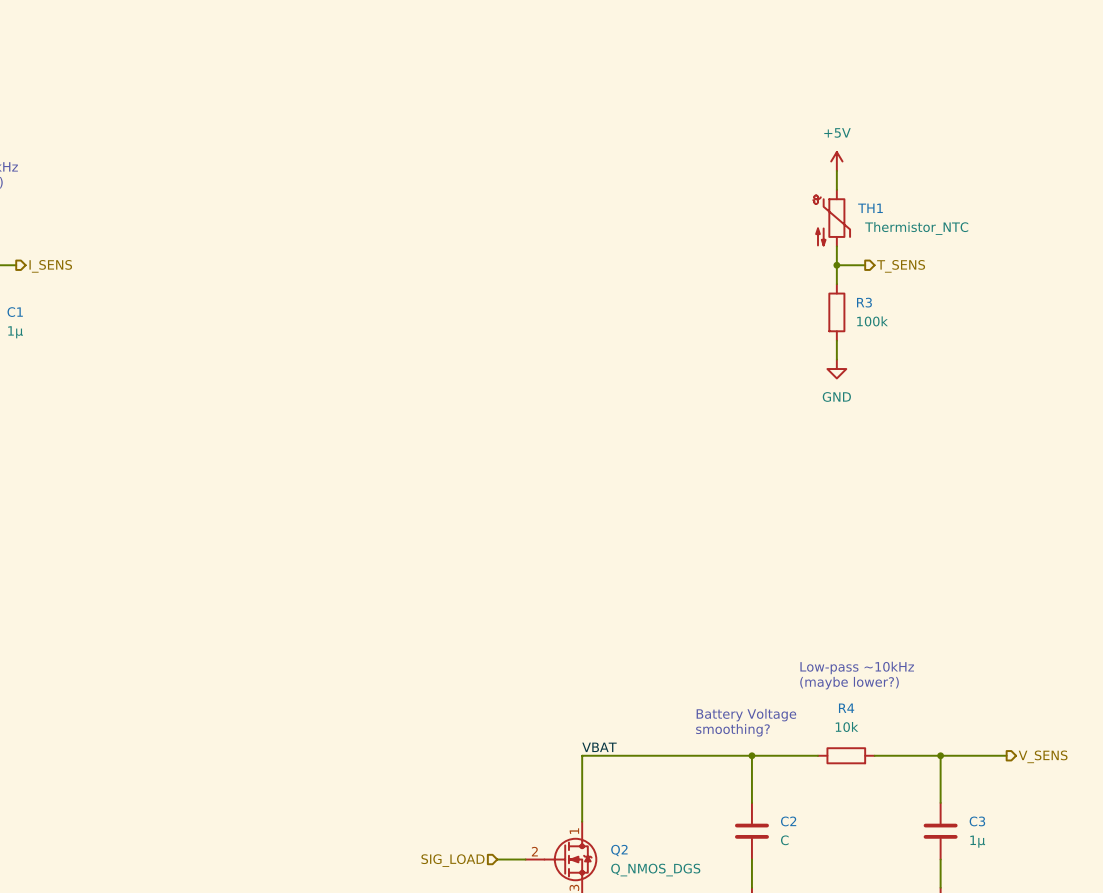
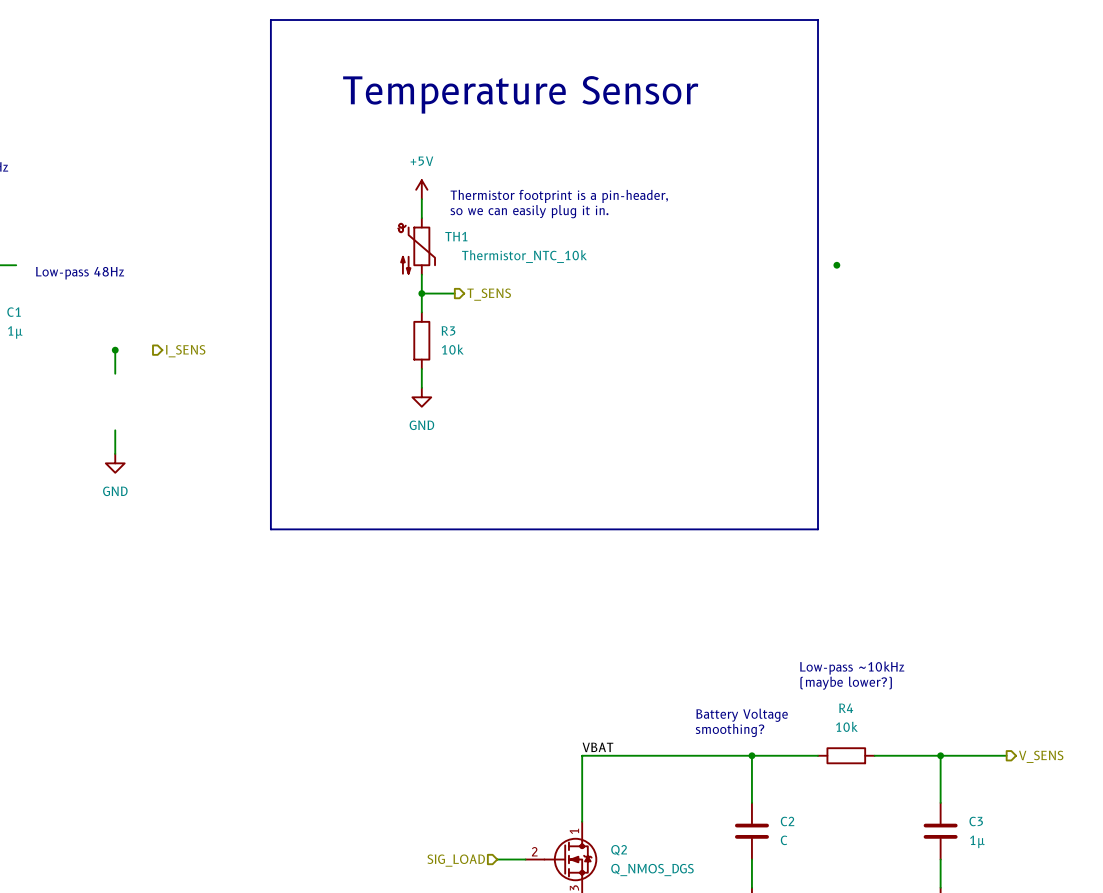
line: none -> (270, 20) (270, 529) (818, 529) (818, 20) (270, 20)
text: none -> Temperature Sensor (520, 94)
power symbol: +5V (836, 161) -> none
wire: (836, 170) (836, 189) -> none
power symbol: none -> +5V (421, 189)
text: none -> Thermistor footprint is a pin-header, (559, 196)
wire: none -> (421, 199) (421, 218)
text: none -> so we can easily plug it in. (529, 211)
TH1 position: (831, 218) -> (416, 246)
TH1 value: Thermistor_NTC (916, 228) -> Thermistor_NTC_10k (524, 256)
wire: (836, 246) (836, 284) -> none
wire: (836, 265) (865, 265) -> none
hierarchical label position: I_SENS (50, 266) -> I_SENS (185, 351)
hierarchical label: T_SENS (901, 266) -> none
text: none -> Low-pass 48Hz (80, 273)
wire: none -> (421, 274) (421, 312)
wire: none -> (421, 293) (454, 293)
junction: none -> (421, 293)
hierarchical label: none -> T_SENS (489, 294)
R3 position: (836, 312) -> (421, 340)
R3 value: 100k (872, 321) -> 10k (452, 349)
wire: (836, 340) (836, 359) -> none
wire: none -> (115, 350) (115, 373)
junction: none -> (115, 350)
wire: none -> (421, 369) (421, 387)
power symbol: GND (836, 369) -> none
power symbol: none -> GND (421, 397)
wire: none -> (115, 430) (115, 453)
power symbol: none -> GND (115, 463)

